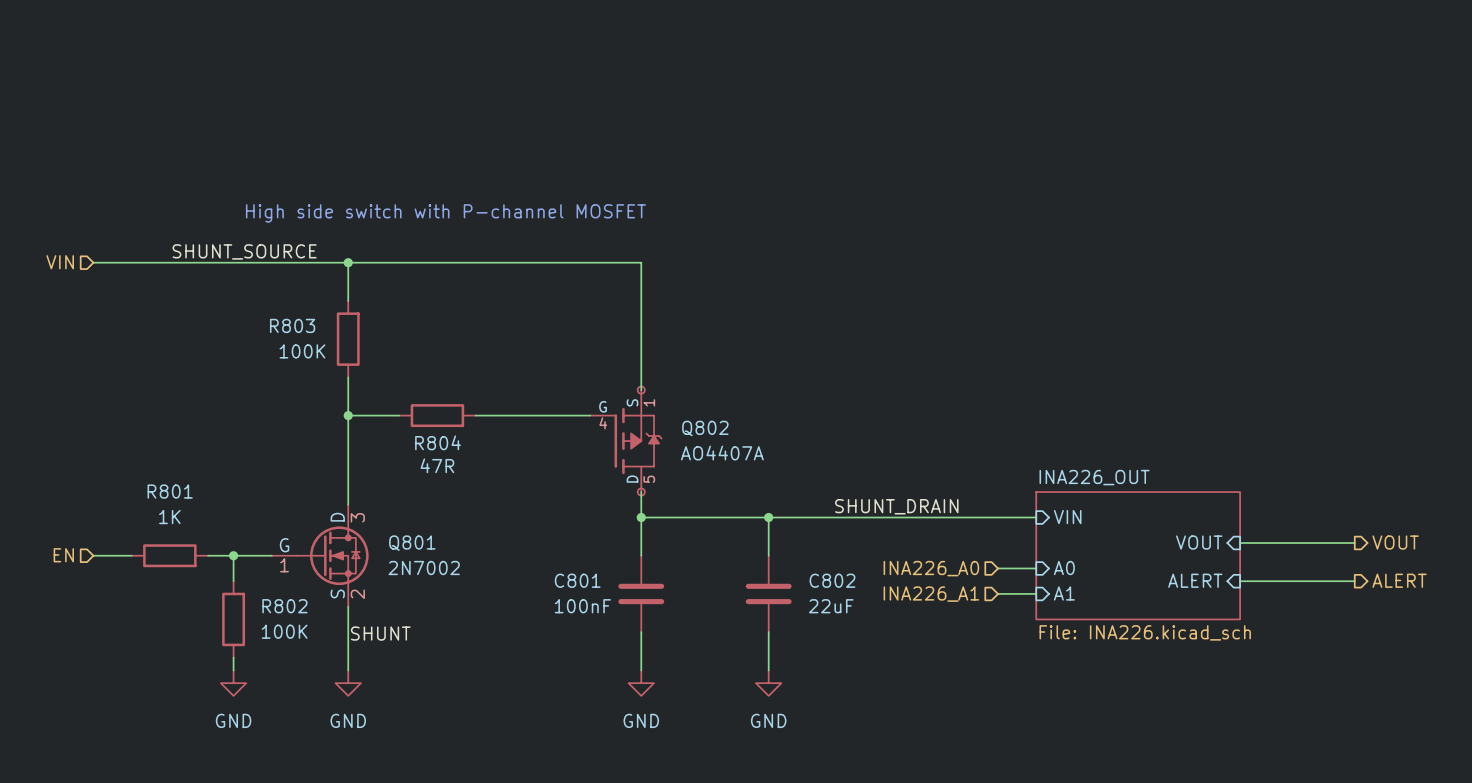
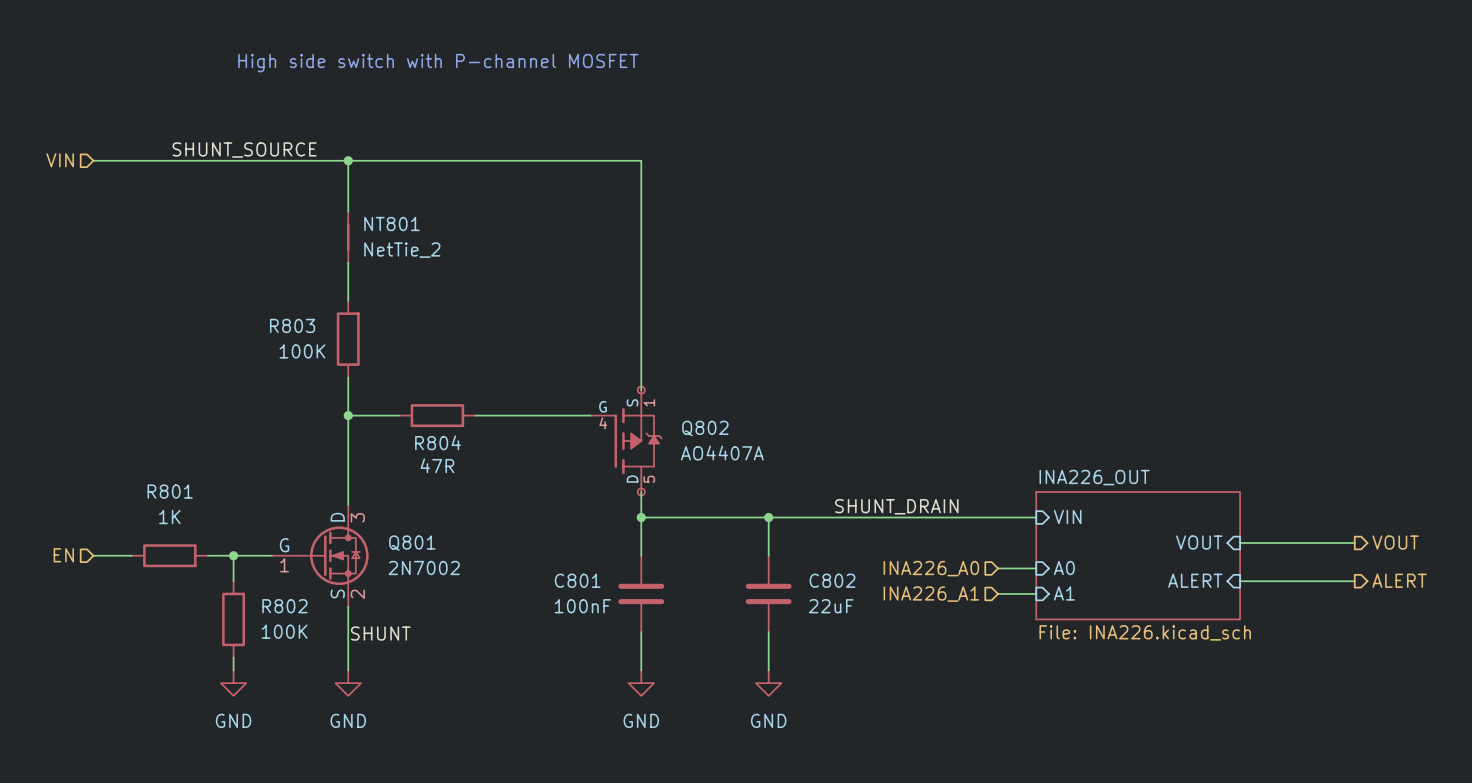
wire: none -> (348, 160) (348, 211)
junction: none -> (348, 160)
text position: High side switch with P-channel MOSFET (445, 213) -> High side switch with P-channel MOSFET (438, 63)
NT801: none -> NetTie_2 (348, 237)
label position: SHUNT_SOURCE (244, 251) -> SHUNT_SOURCE (244, 150)
hierarchical label position: VIN (60, 262) -> VIN (60, 160)
wire: (93, 262) (641, 262) -> (93, 160) (641, 160) (641, 262)
junction: (348, 262) -> none

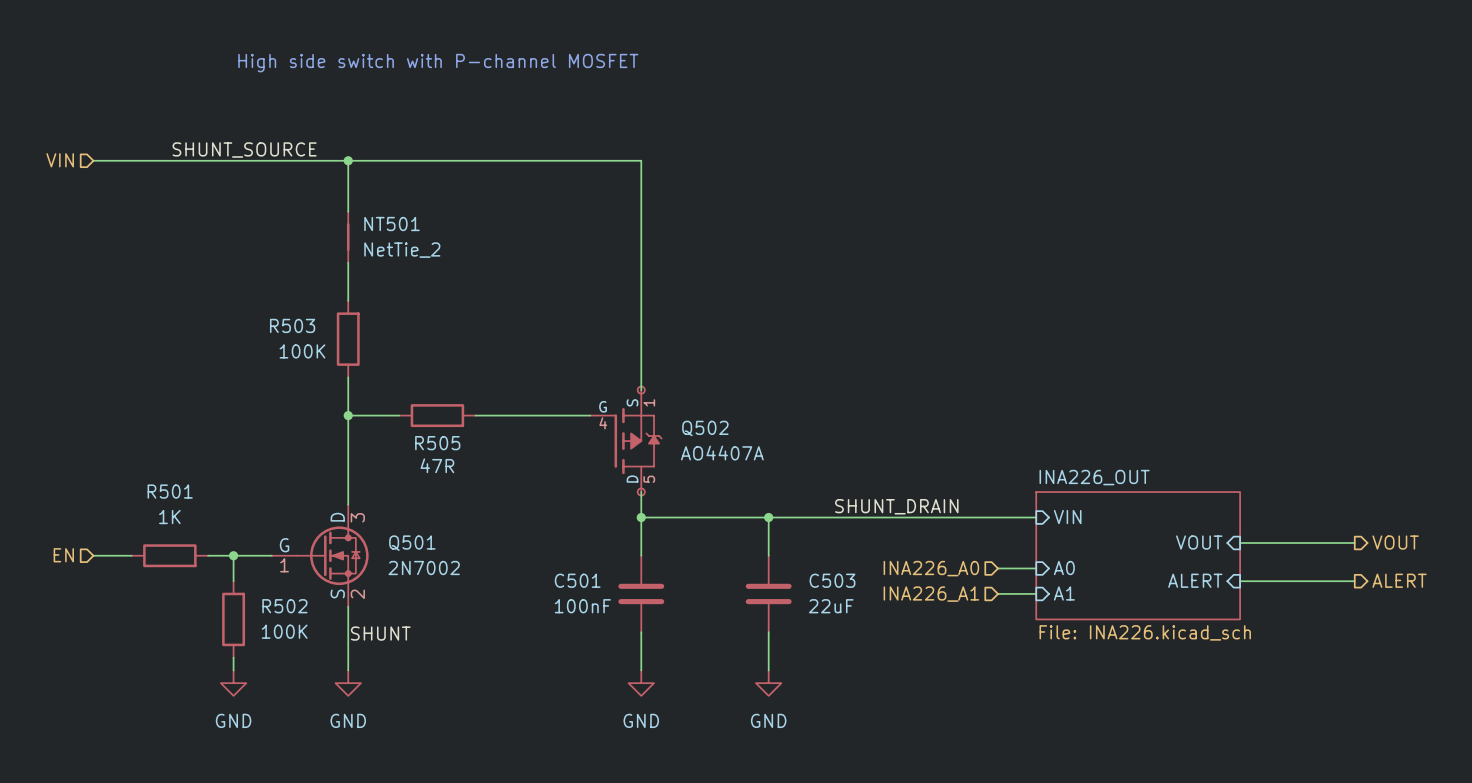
NT801 name: NT801 (392, 224) -> NT501 (392, 224)
R803 name: R803 (292, 325) -> R503 (292, 325)
Q802 name: Q802 (705, 428) -> Q502 (705, 428)
R804 name: R804 (438, 442) -> R505 (437, 443)
R801 name: R801 (170, 491) -> R501 (170, 491)
Q801 name: Q801 (412, 543) -> Q501 (412, 543)
C801 name: C801 (577, 580) -> C501 (577, 580)
C802 name: C802 (832, 580) -> C503 (832, 580)
R802 name: R802 (284, 606) -> R502 (284, 606)

